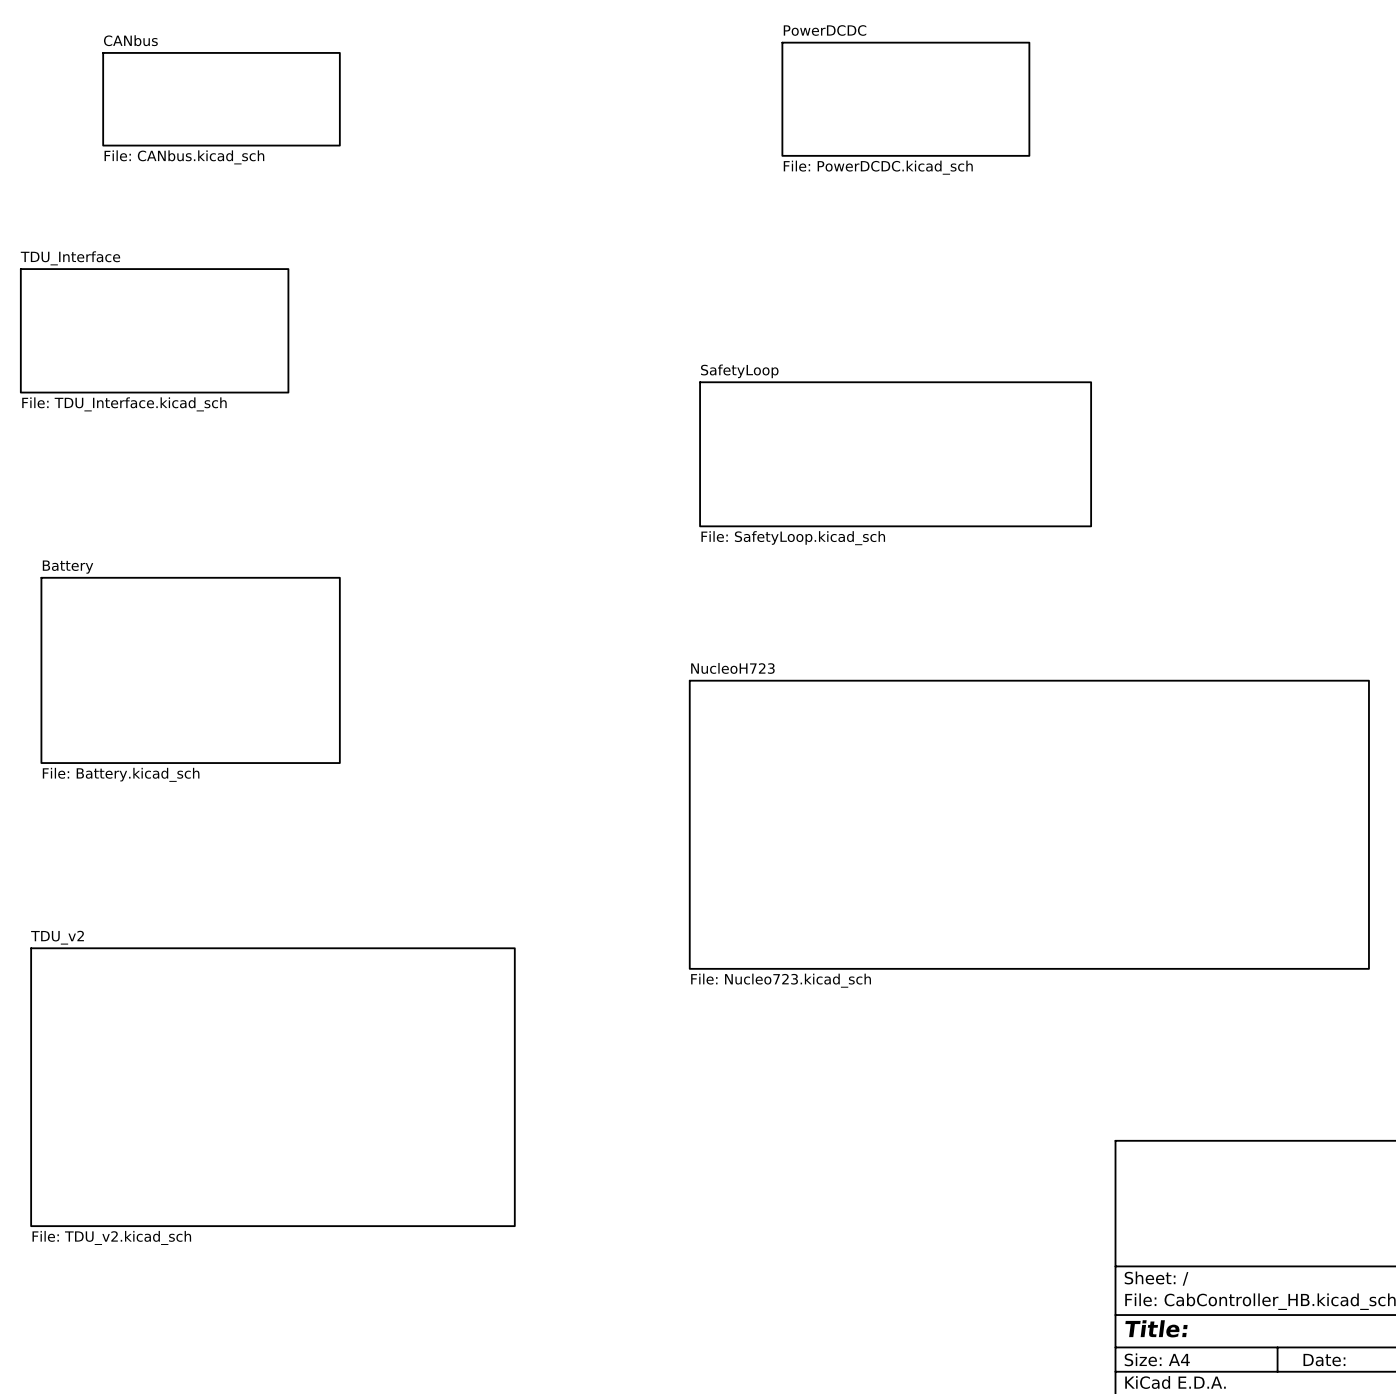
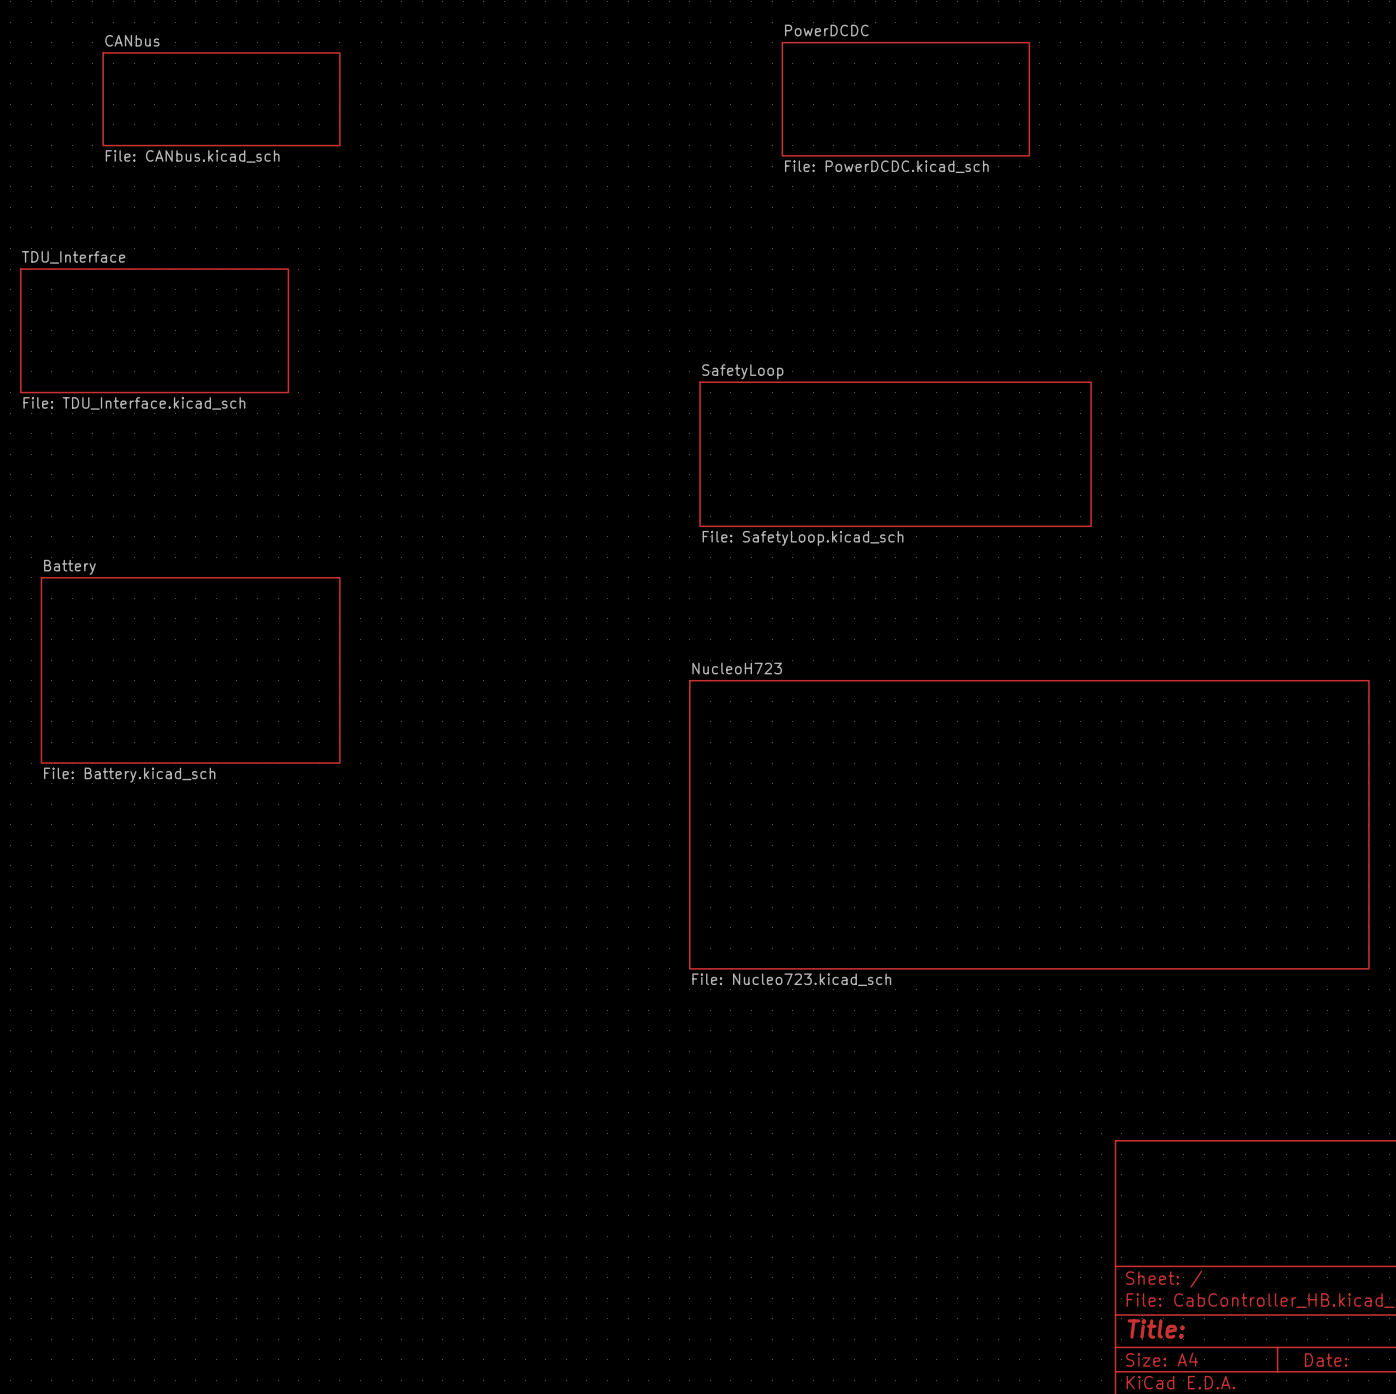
sheet TDU_v2: File: TDU_v2.kicad_sch (272, 1087) -> none

